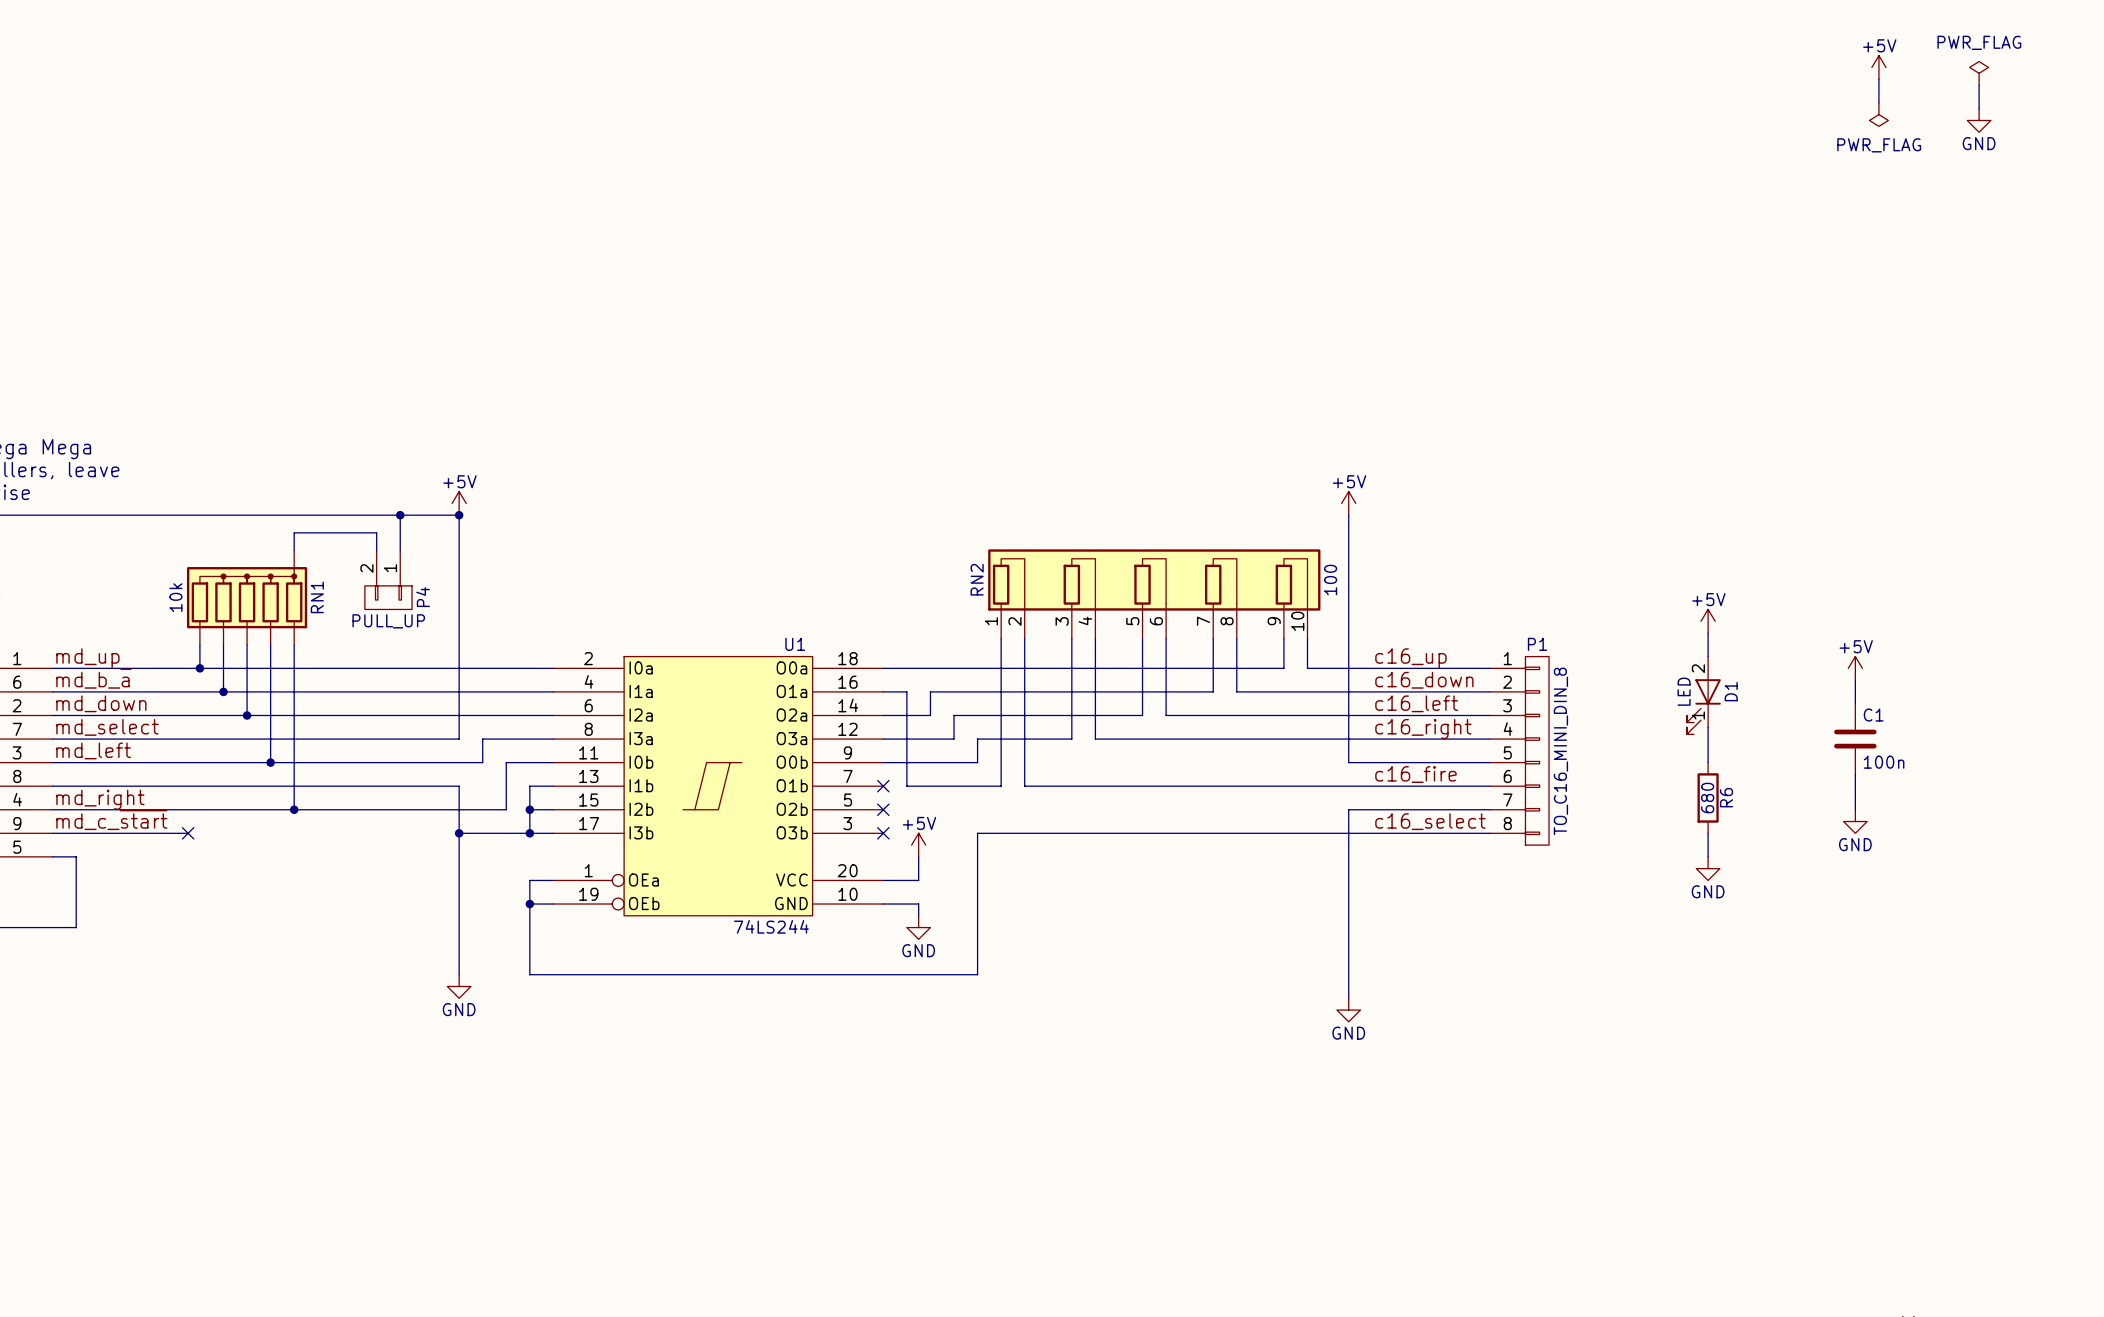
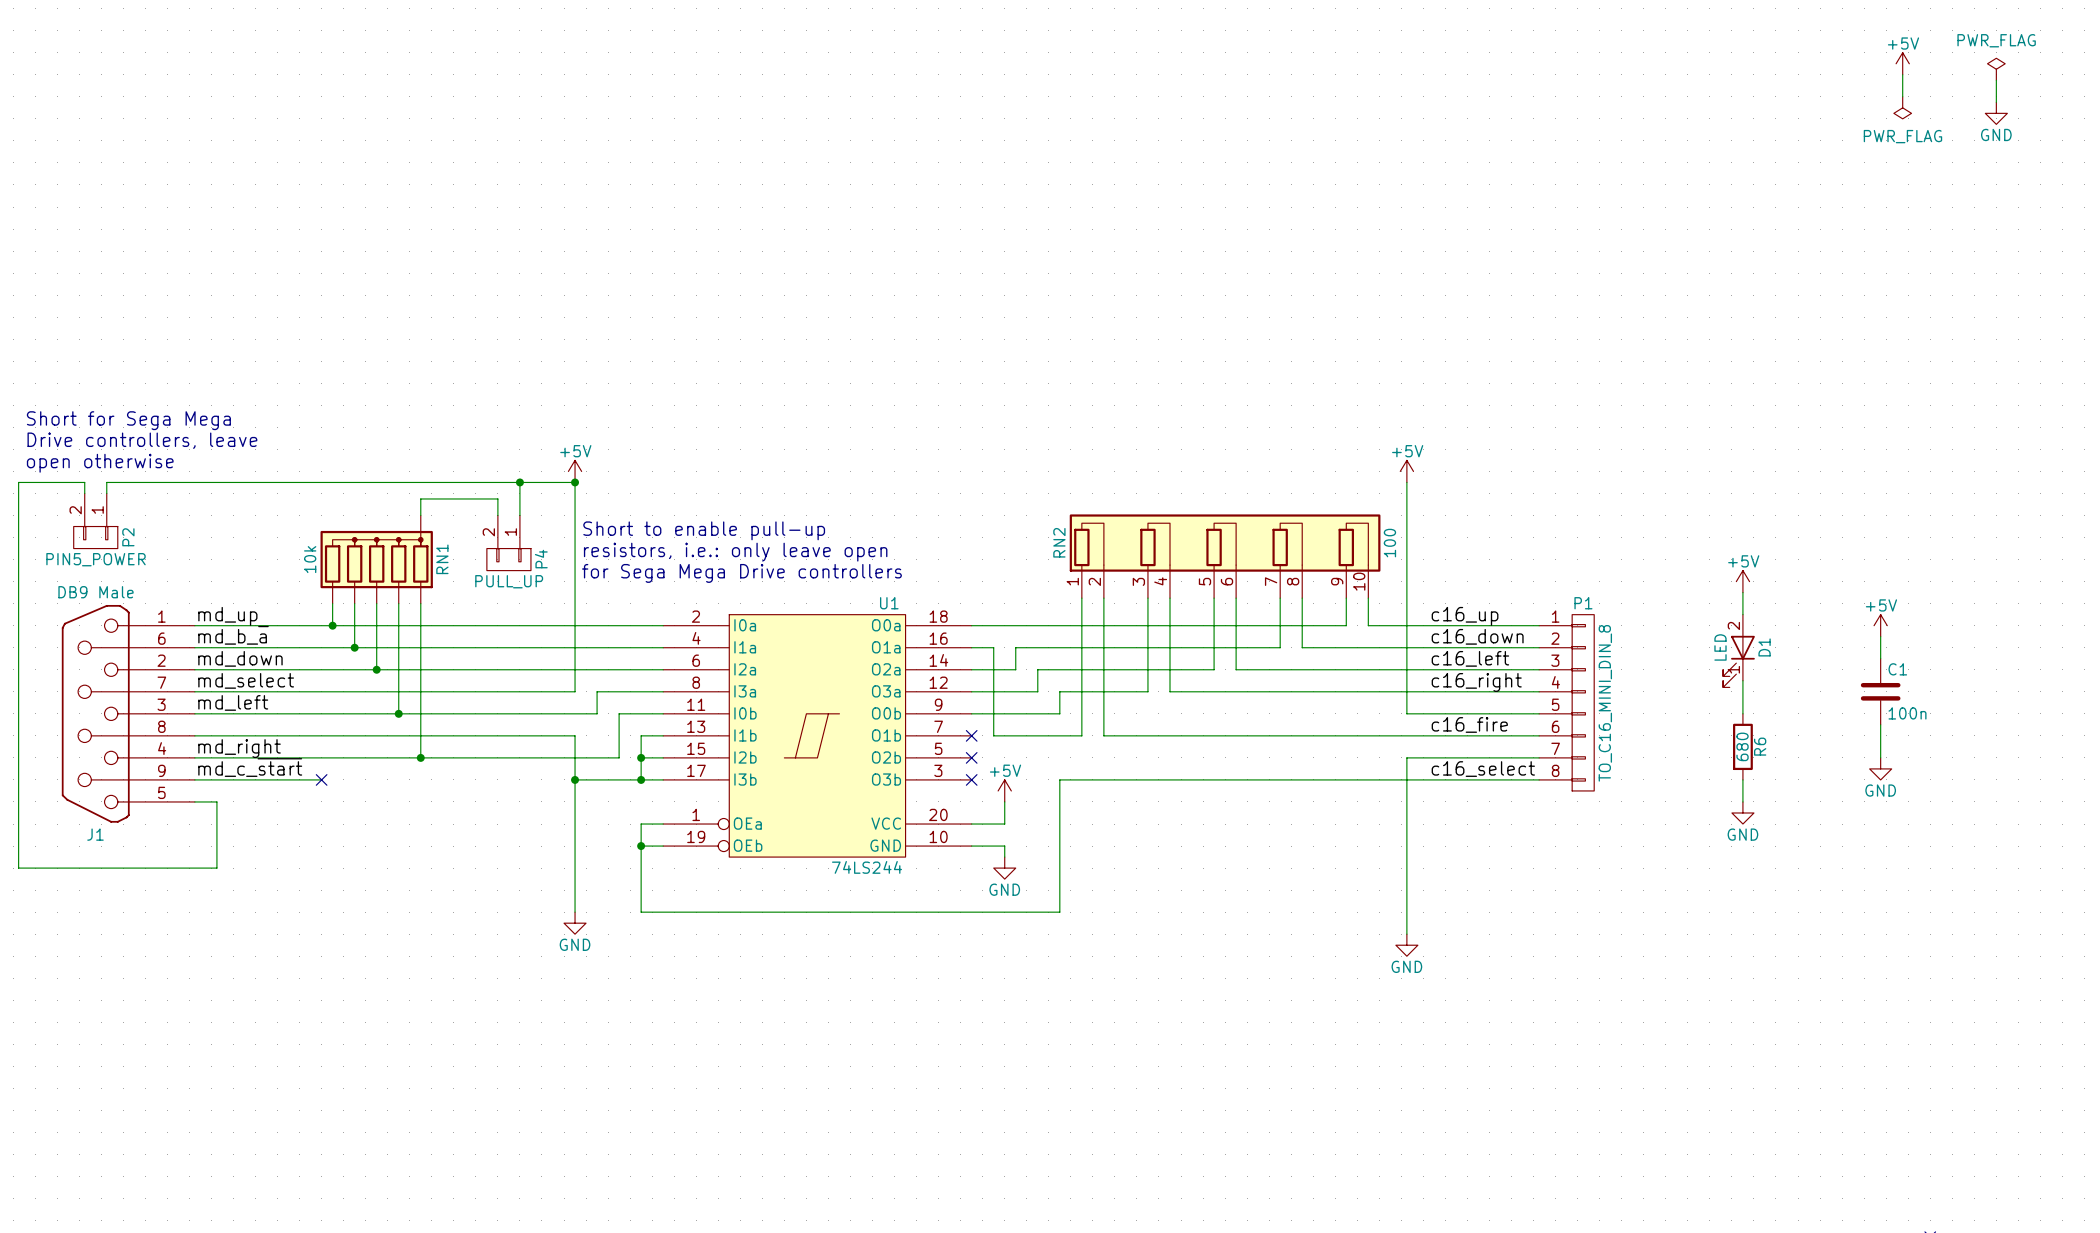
text: none -> Short to enable pull-up (704, 530)
text: none -> resistors, i.e.: only leave open (735, 552)
text: none -> for Sega Mega Drive controllers (741, 573)

